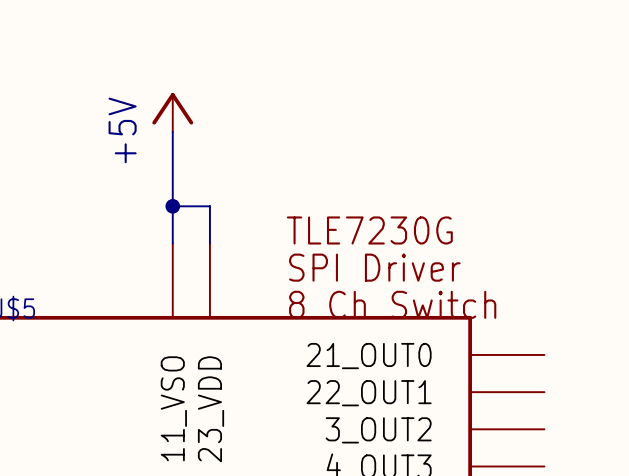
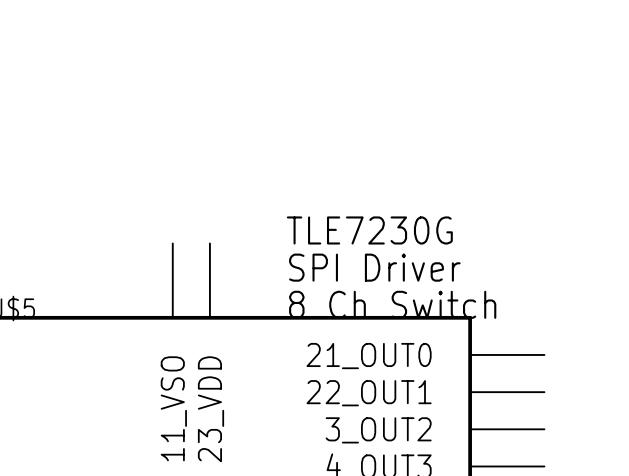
power symbol: +5V (172, 112) -> none
wire: (172, 131) (172, 243) -> none
wire: (172, 206) (209, 206) (209, 243) -> none
junction: (172, 206) -> none

